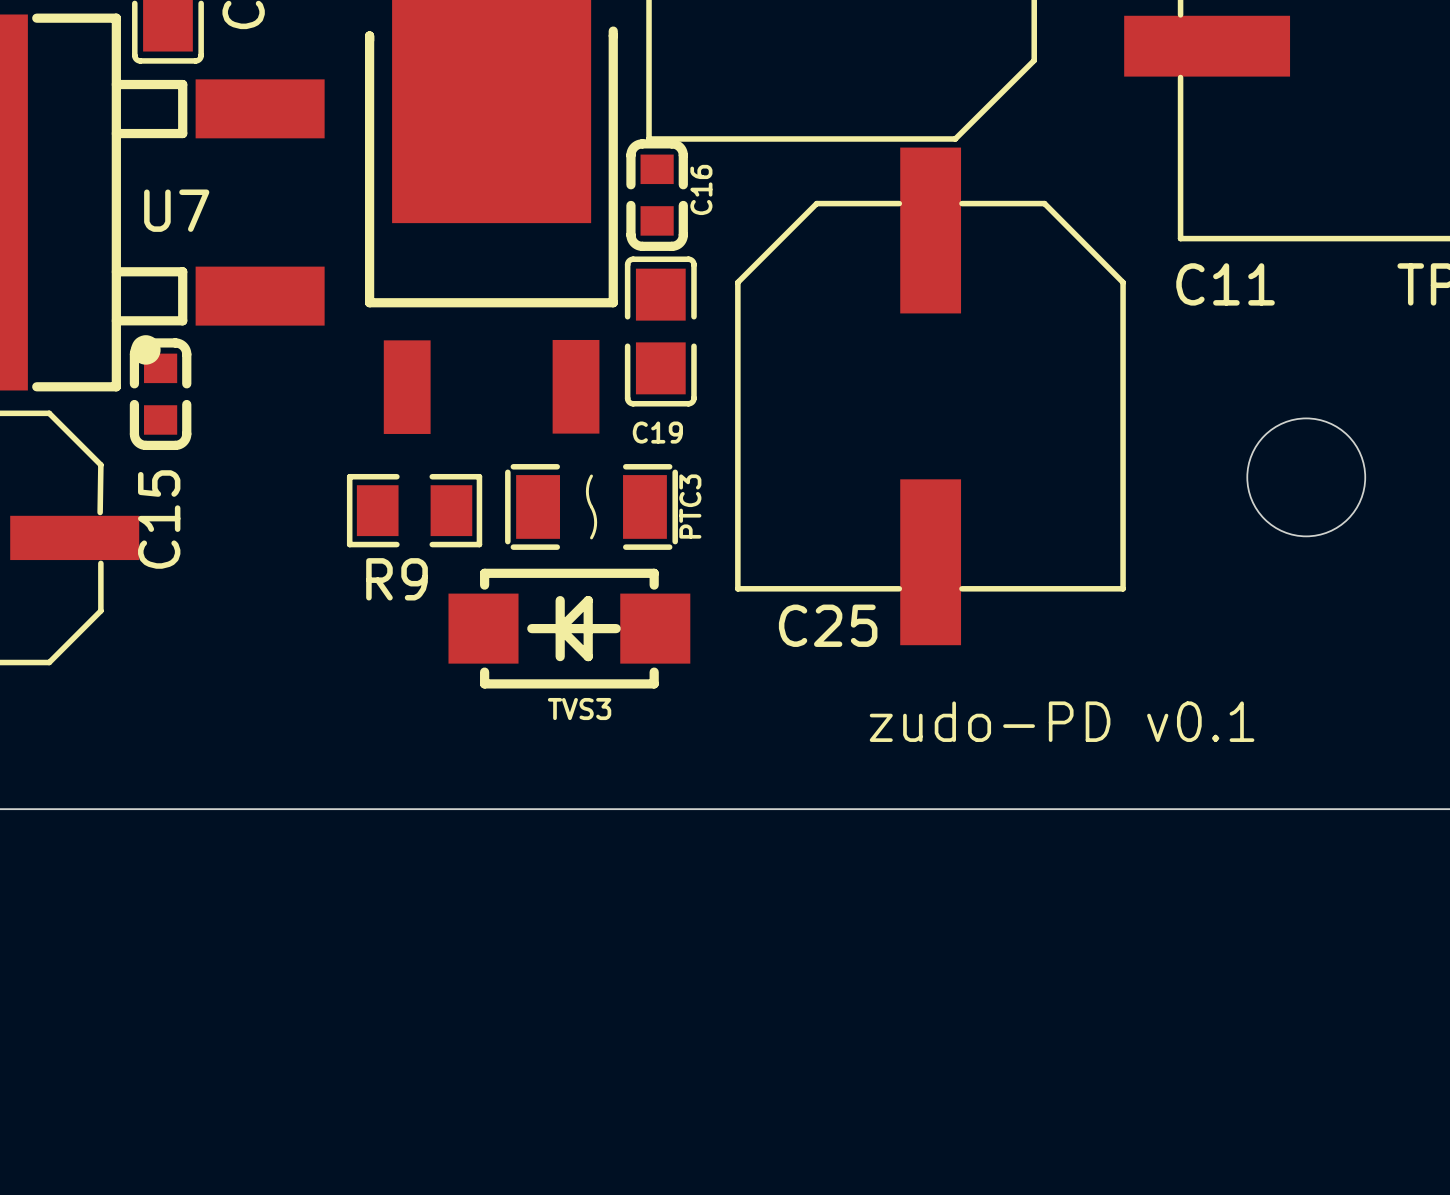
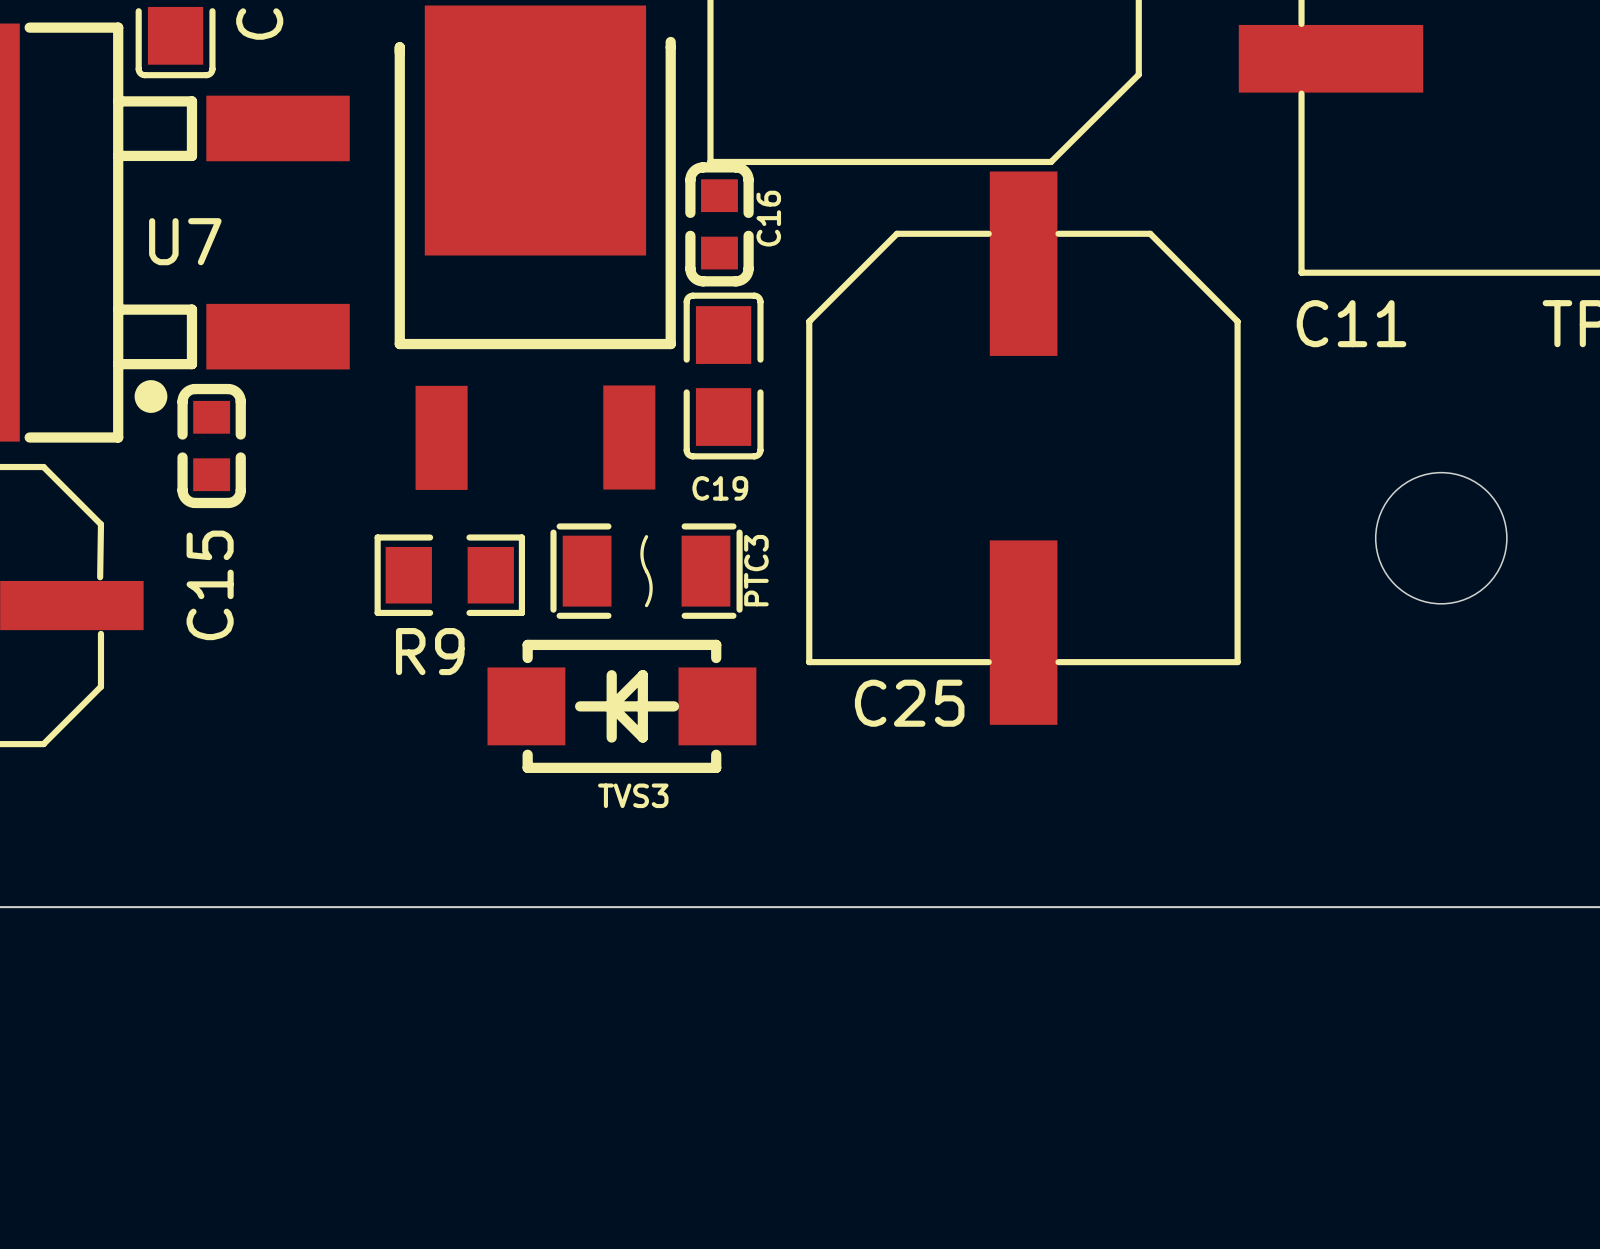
C15 position: (160, 394) -> (211, 446)
text: zudo-PD v0.1 (1062, 721) -> none

